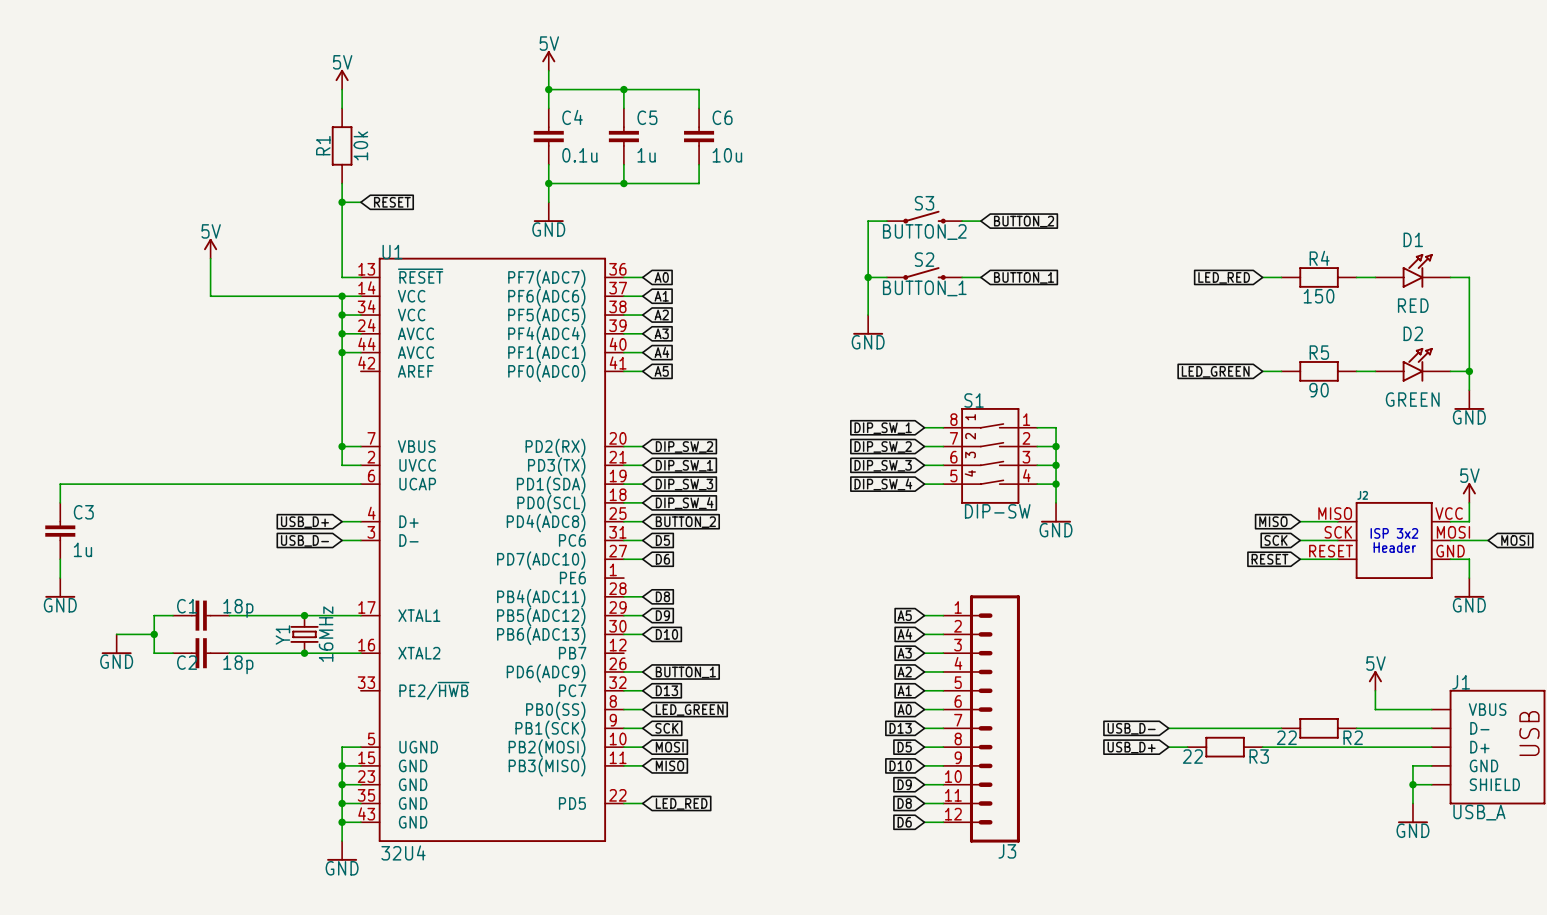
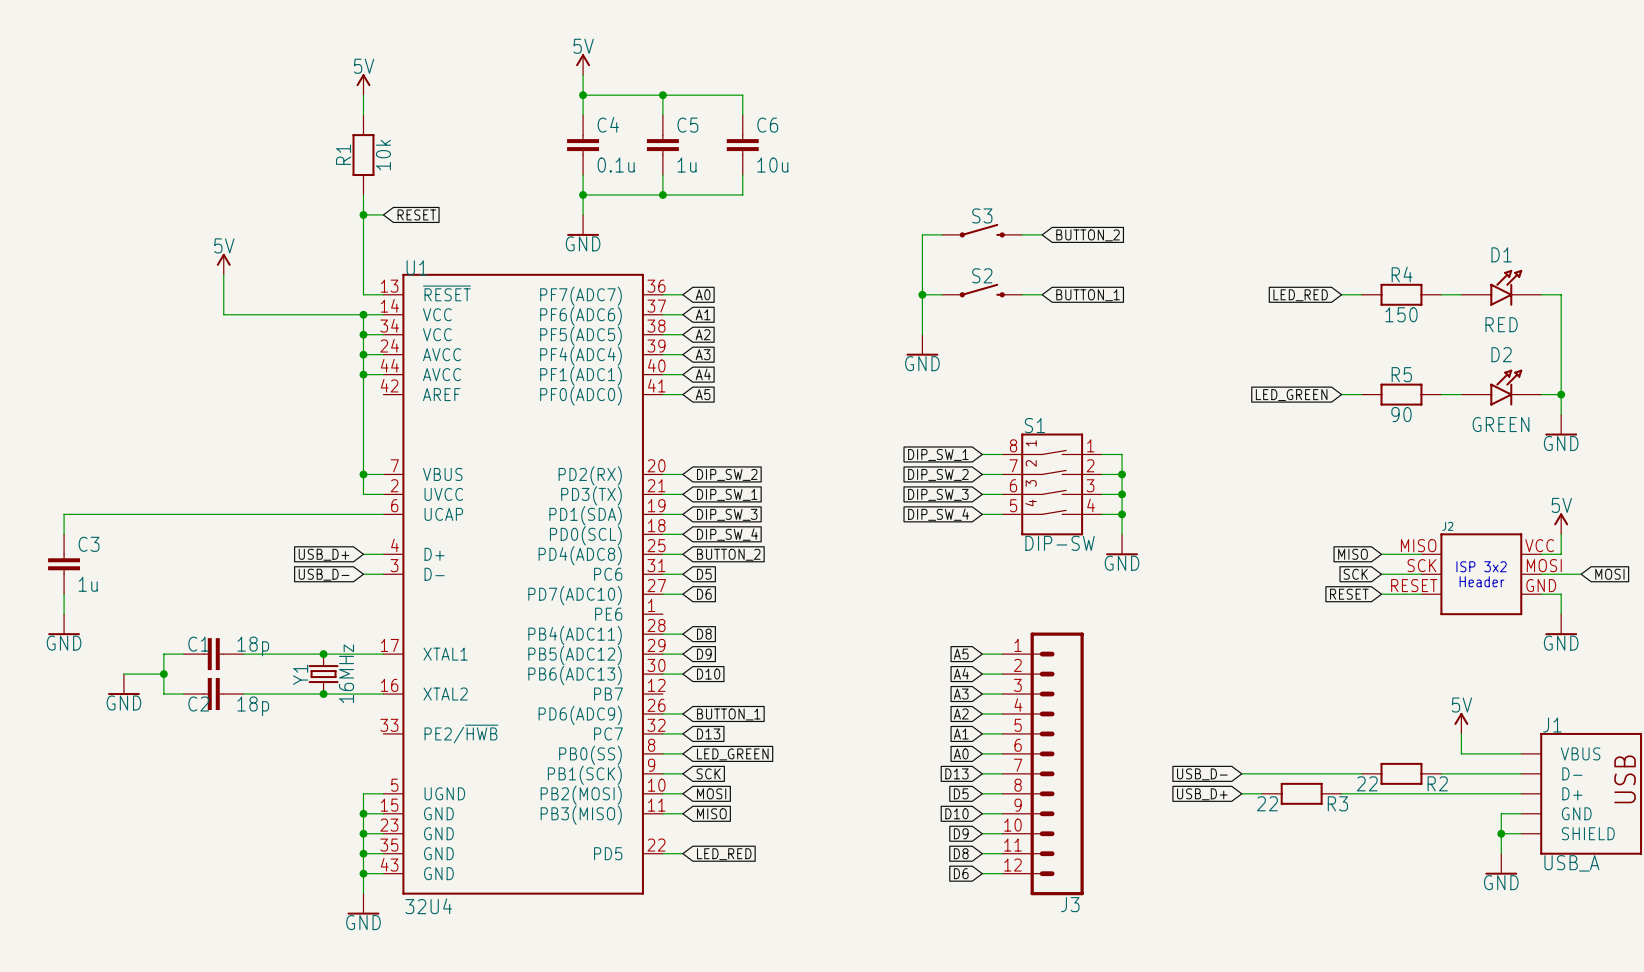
S3 value: BUTTON_2 (924, 232) -> none
S2 value: BUTTON_1 (924, 288) -> none

